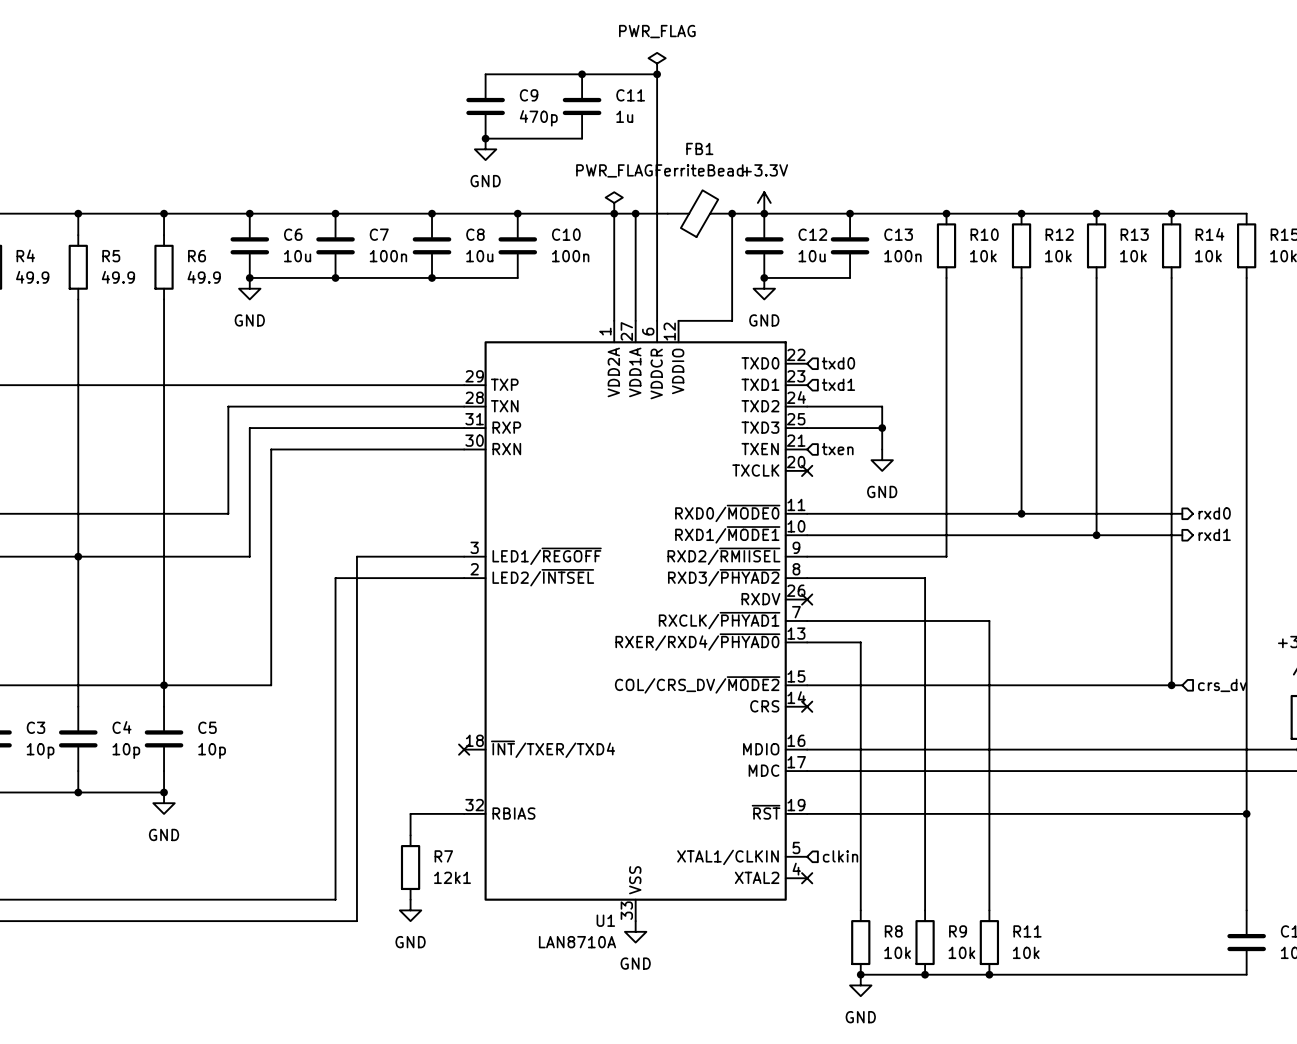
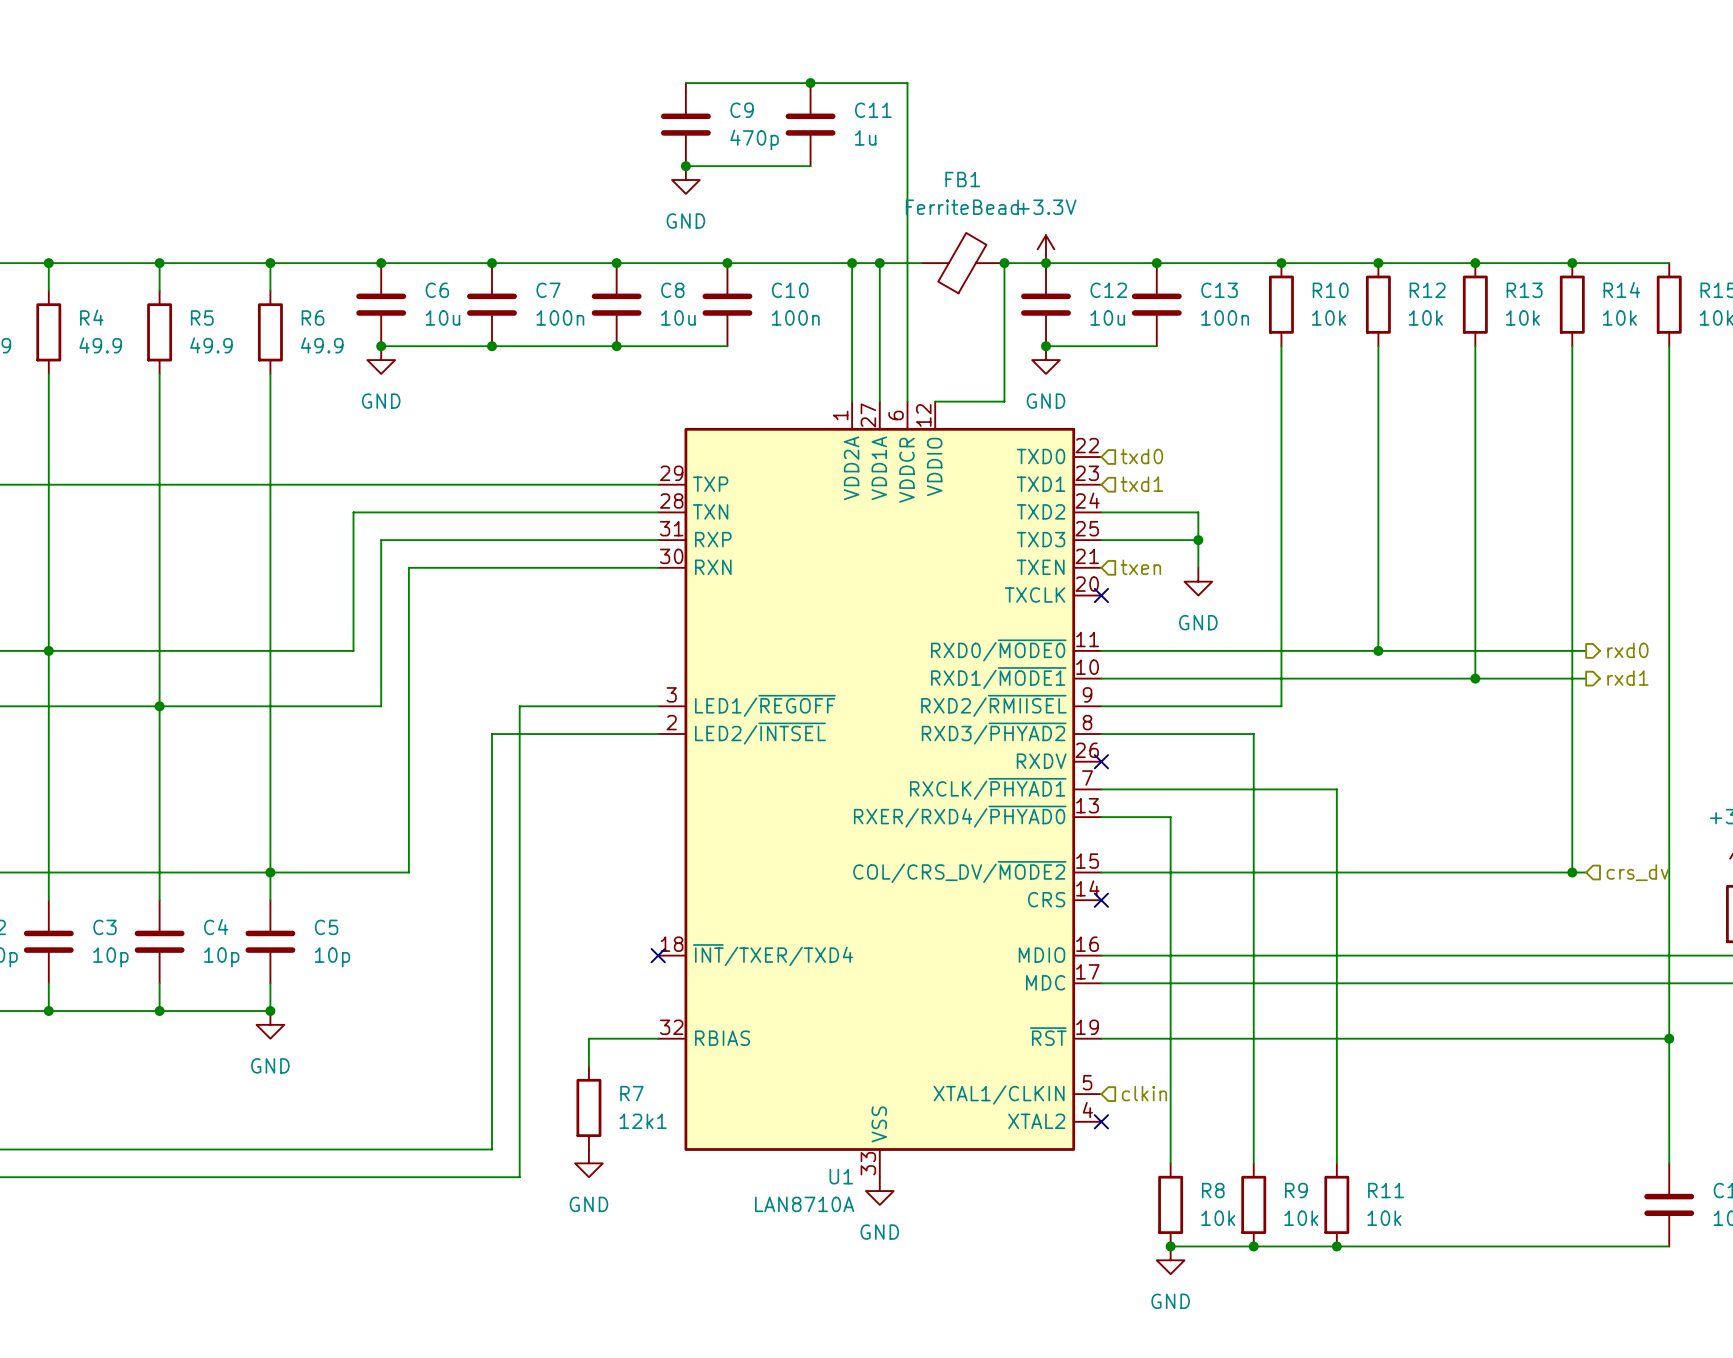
power symbol: PWR_FLAG (657, 63) -> none
junction: (657, 74) -> none
power symbol: PWR_FLAG (614, 202) -> none

